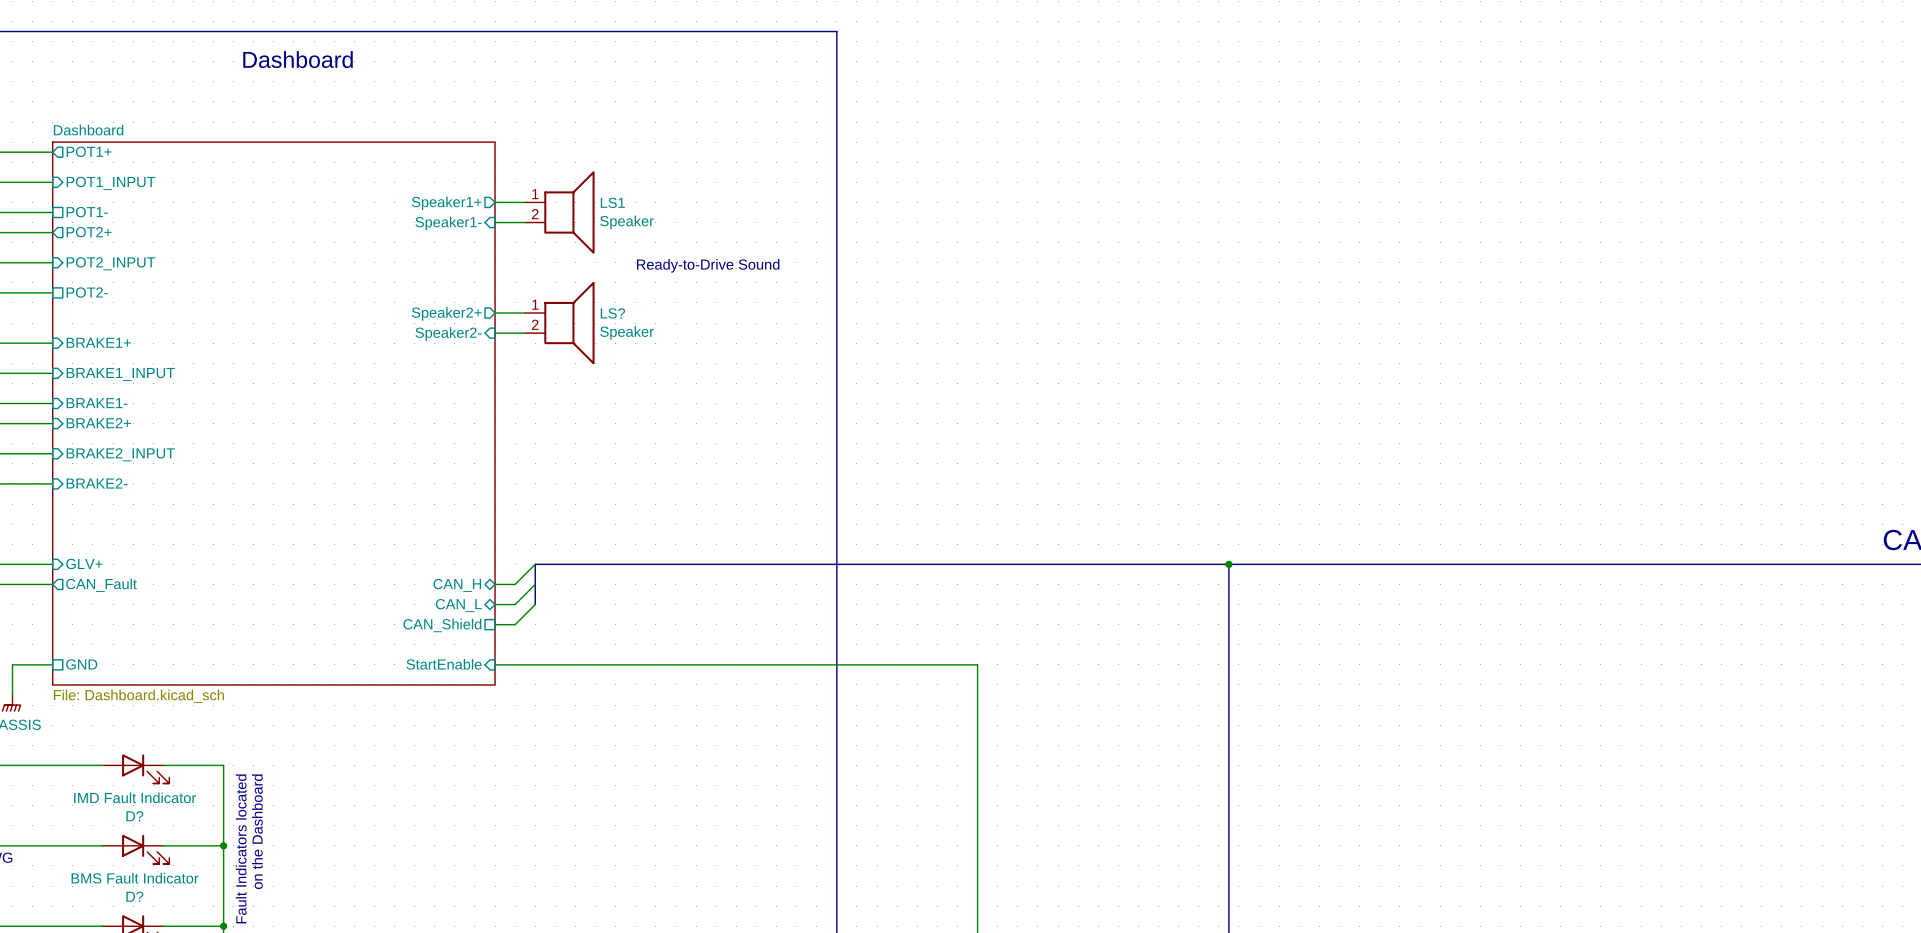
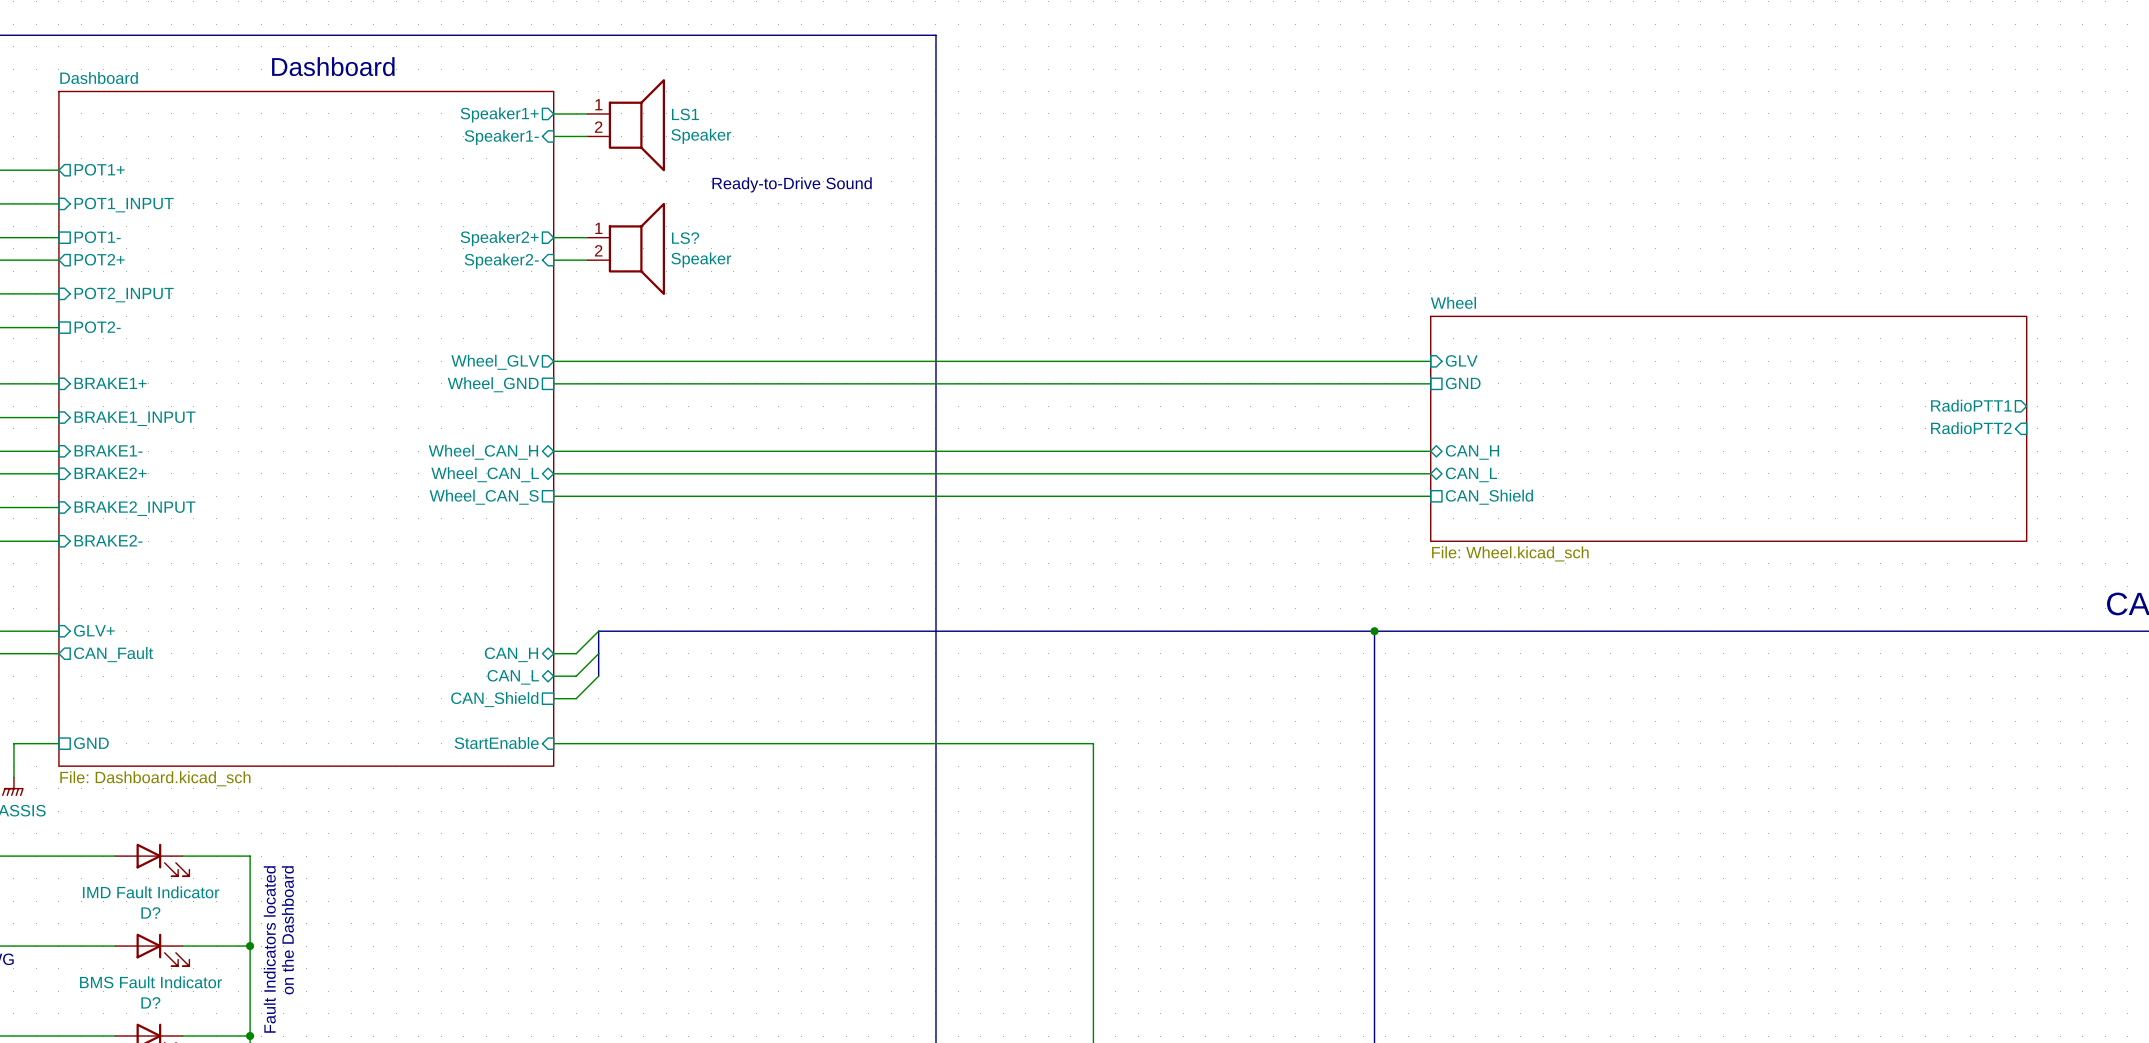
wire: (495, 202) (525, 202) -> (553, 113) (587, 113)
sheet pin position: Speaker1+ (446, 203) -> Speaker1+ (499, 114)
LS1 position: (559, 212) -> (626, 125)
wire: (495, 222) (525, 222) -> (553, 136) (587, 136)
sheet pin position: Speaker1- (448, 223) -> Speaker1- (501, 137)
text position: Ready-to-Drive Sound (708, 265) -> Ready-to-Drive Sound (792, 184)
sheet pin position: Speaker2+ (446, 313) -> Speaker2+ (499, 238)
wire: (495, 313) (525, 313) -> (553, 237) (587, 237)
sheet pin: none -> GLV (1461, 360)
sheet pin: none -> Wheel_GLV (495, 362)
wire: none -> (553, 361) (1430, 361)
LS? position: (559, 323) -> (626, 248)
sheet pin position: Speaker2- (448, 333) -> Speaker2- (501, 261)
wire: (495, 333) (525, 333) -> (553, 260) (587, 260)
sheet pin: none -> GND (1463, 383)
sheet pin: none -> Wheel_GND (493, 384)
wire: none -> (553, 383) (1430, 383)
sheet pin: none -> RadioPTT1 (1971, 405)
sheet pin: none -> RadioPTT2 (1971, 428)
sheet Dashboard: none -> File: Dashboard.kicad_sch (306, 428)
sheet Wheel: none -> File: Wheel.kicad_sch (1728, 428)
wire: none -> (553, 451) (1430, 451)
sheet pin: none -> Wheel_CAN_H (483, 452)
sheet pin: none -> CAN_H (1472, 452)
sheet Dashboard: File: Dashboard.kicad_sch (273, 413) -> none
wire: none -> (553, 473) (1430, 473)
sheet pin: none -> Wheel_CAN_L (485, 474)
sheet pin: none -> CAN_L (1471, 474)
wire: none -> (553, 496) (1430, 496)
sheet pin: none -> Wheel_CAN_S (484, 497)
sheet pin: none -> CAN_Shield (1489, 497)

